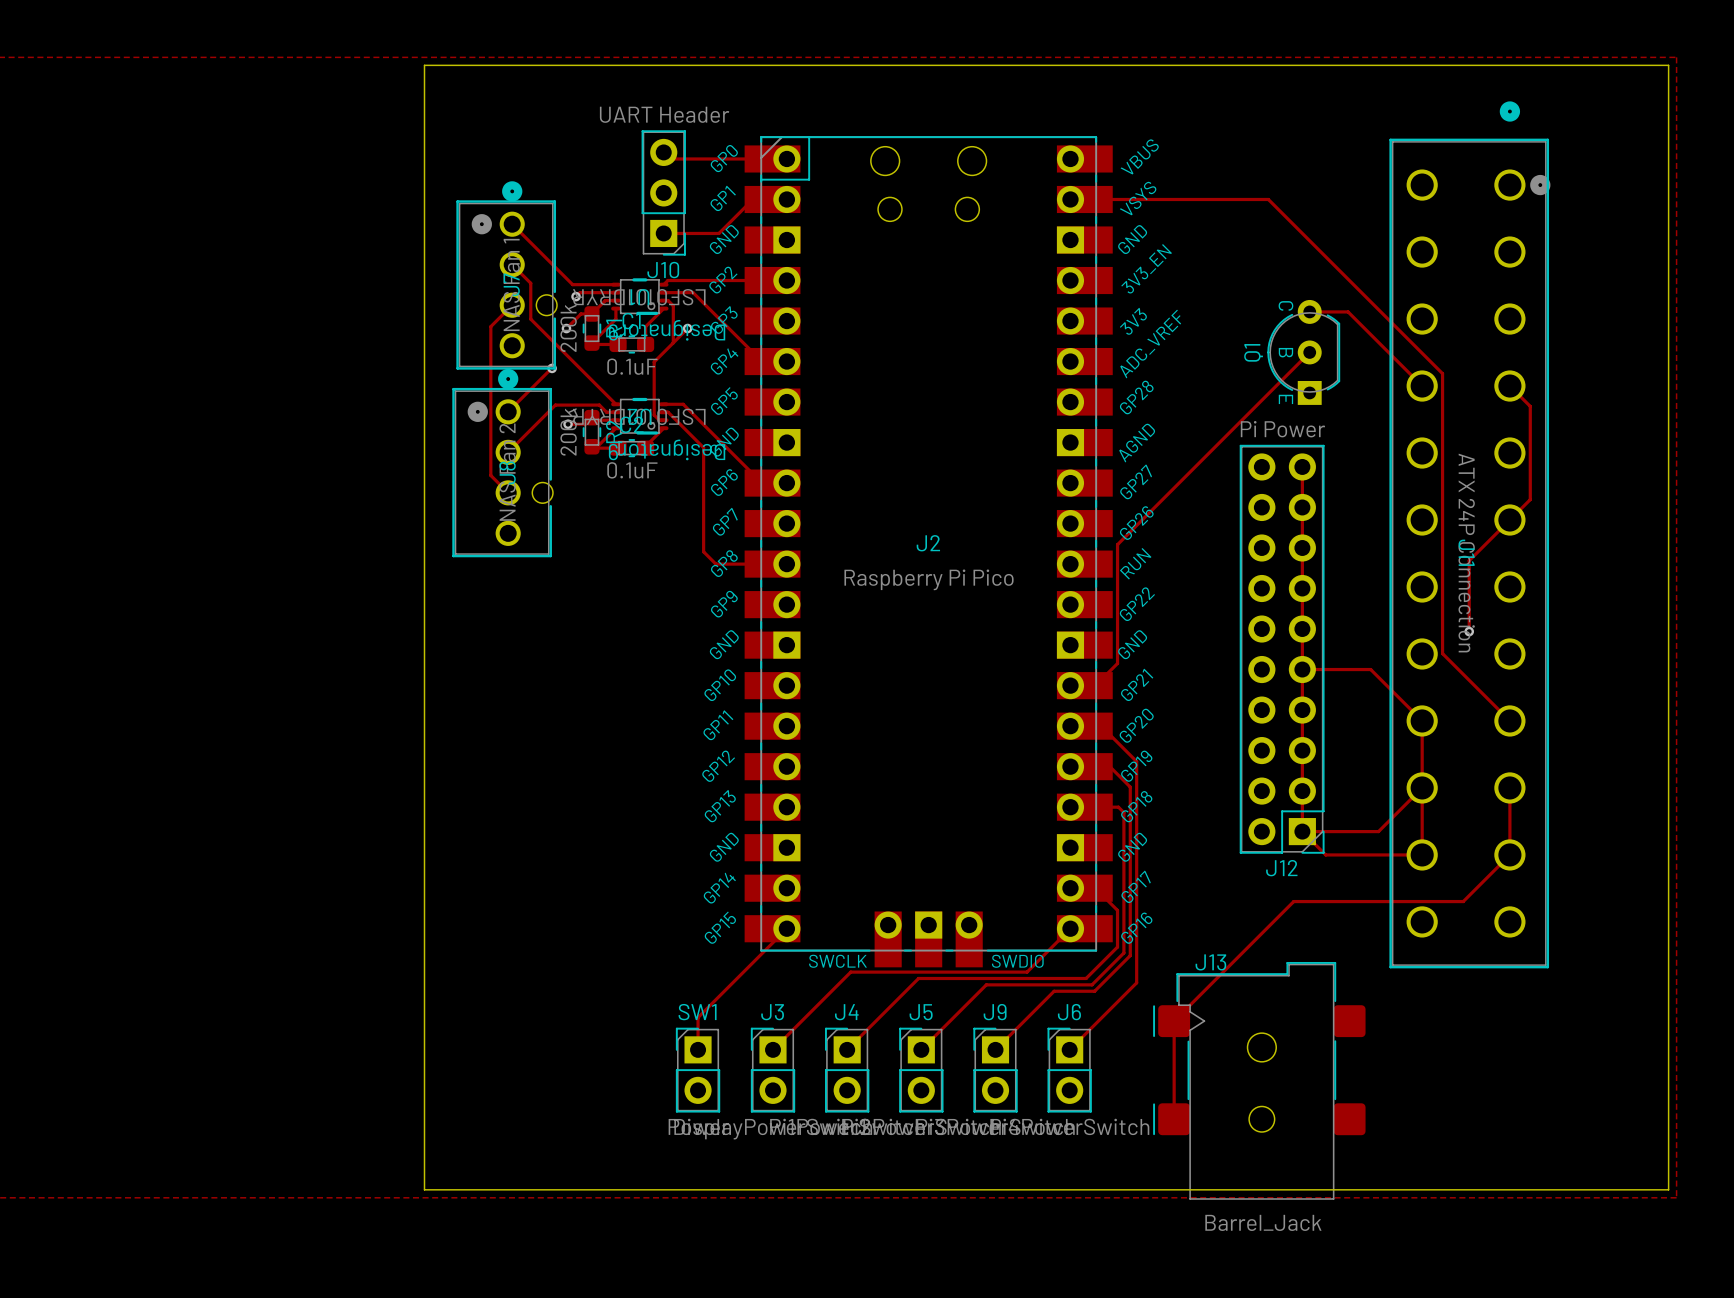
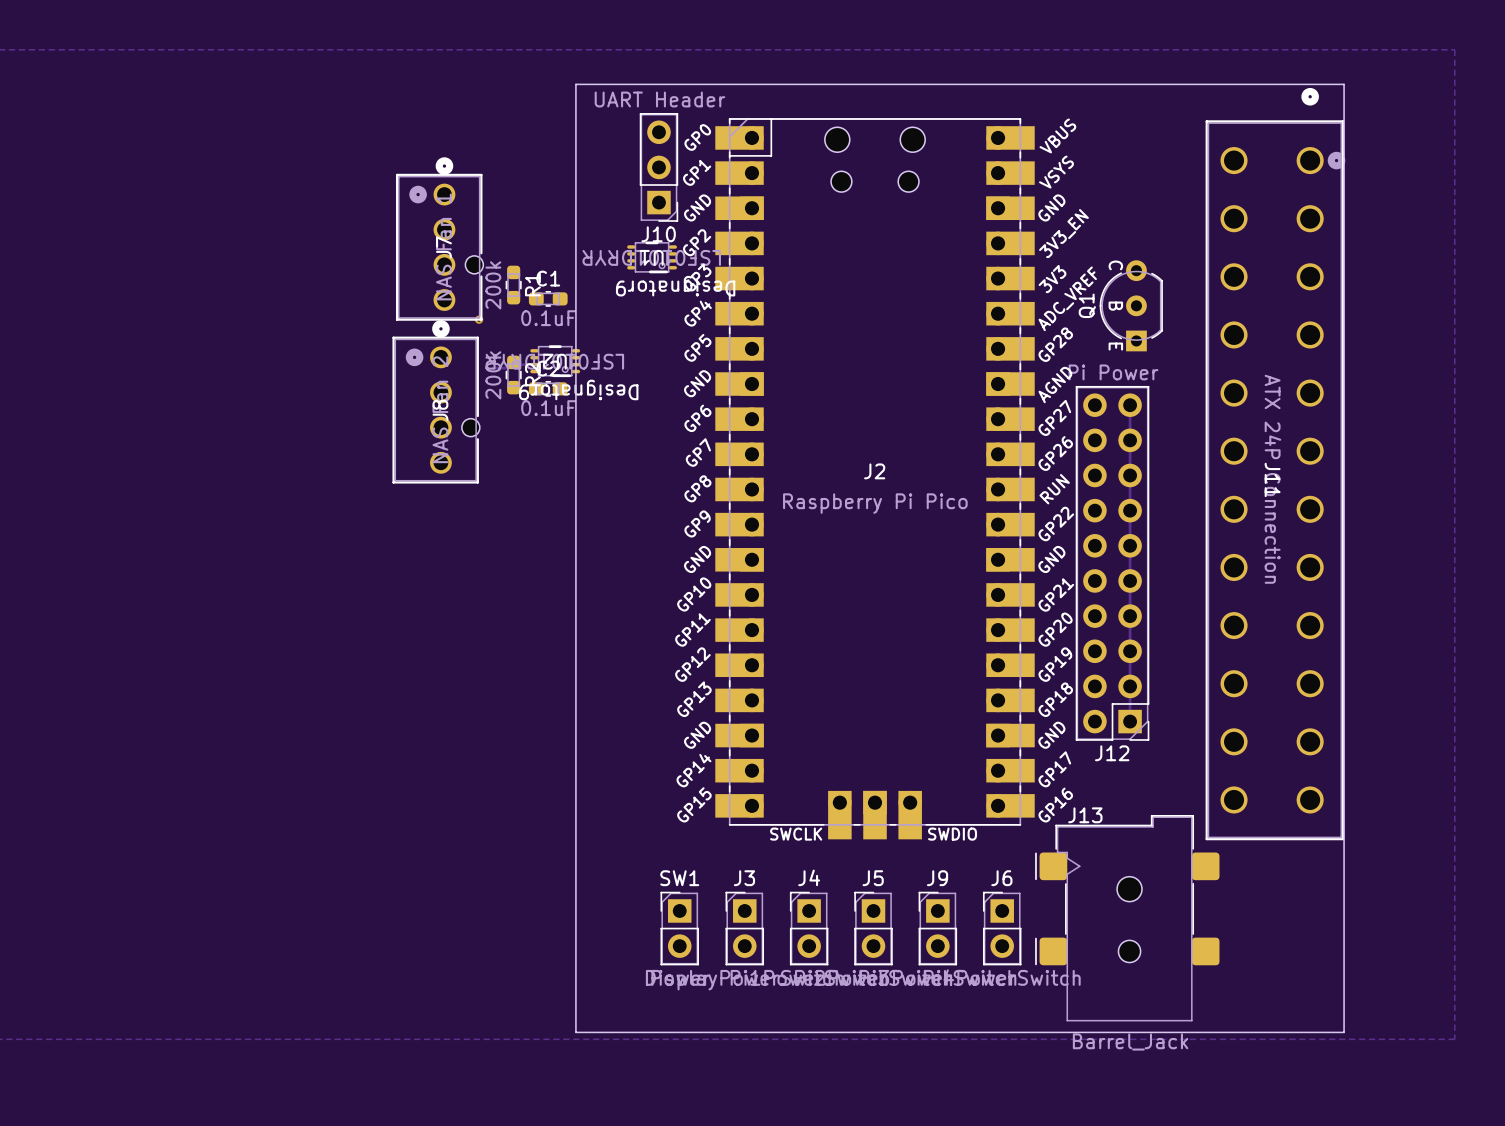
track: (663, 152) (670, 158) (786, 158) -> none
J10 position: (663, 192) -> (658, 167)
track: (786, 199) (752, 199) (718, 233) (663, 233) -> none
track: (1070, 199) (1268, 199) (1442, 373) (1442, 653) (1509, 720) -> none
track: (512, 224) (572, 284) (615, 284) -> none
track: (512, 264) (530, 283) (530, 319) (615, 404) -> none
track: (786, 280) (667, 280) (663, 284) -> none
track: (615, 292) (580, 292) (576, 296) -> none
track: (663, 292) (693, 292) (762, 361) (786, 361) -> none
via: (576, 296) -> none
U1 position: (639, 296) -> (652, 257)
track: (615, 300) (605, 300) (591, 313) (581, 313) (566, 328) -> none
track: (663, 300) (668, 300) (673, 305) (673, 342) -> none
track: (512, 305) (490, 326) (490, 475) (508, 492) -> none
track: (615, 308) (615, 319) (591, 343) (618, 344) -> none
track: (663, 308) (645, 326) (645, 344) -> none
track: (1309, 311) (1348, 311) (1422, 386) -> none
via: (566, 328) -> none
track: (687, 328) (654, 362) (654, 415) (659, 420) (663, 420) -> none
via: (687, 328) -> none
track: (1309, 352) (1117, 544) (1117, 663) (1095, 685) (1070, 685) -> none
track: (552, 368) (508, 411) -> none
track: (1509, 386) (1530, 406) (1530, 499) (1469, 560) (1469, 631) -> none
track: (663, 404) (683, 404) (762, 483) (786, 483) -> none
track: (615, 412) (606, 412) (599, 405) (555, 405) (508, 452) -> none
track: (663, 412) (668, 412) (703, 447) (703, 551) (715, 564) (786, 564) -> none
via: (568, 424) -> none
track: (615, 428) (597, 446) (591, 446) (618, 448) -> none
track: (663, 428) (645, 448) -> none
J2 position: (928, 551) -> (875, 478)
via: (1469, 631) -> none
track: (1302, 669) (1370, 669) (1422, 720) (1422, 854) (1325, 854) (1302, 831) (1378, 831) (1422, 787) -> none
track: (1070, 726) (1101, 726) (1136, 761) (1136, 982) (1069, 1049) -> none
track: (1070, 766) (1109, 766) (1130, 787) (1130, 955) (1094, 991) (1054, 991) (995, 1049) -> none
track: (1509, 787) (1509, 854) (1463, 901) (1293, 901) (1174, 1021) (1174, 1119) -> none
track: (1070, 807) (1118, 807) (1123, 812) (1123, 952) (1092, 984) (986, 984) (921, 1049) -> none
track: (1070, 888) (1095, 888) (1117, 910) (1117, 947) (1086, 978) (918, 978) (847, 1049) -> none
track: (786, 928) (698, 1017) (698, 1049) -> none
track: (1070, 928) (1027, 972) (850, 972) (773, 1049) -> none
SW1 position: (698, 1070) -> (679, 928)
J3 position: (773, 1070) -> (744, 928)
J4 position: (847, 1070) -> (809, 928)
J5 position: (921, 1070) -> (873, 928)
J9 position: (995, 1070) -> (937, 928)
J6 position: (1069, 1070) -> (1002, 928)
J13 position: (1259, 1080) -> (1127, 918)
board edge: (663, 1189) (424, 1189) (424, 65) (1668, 65) (1668, 1189) (1548, 1189) -> (575, 1032) (575, 84) (1344, 84) (1344, 1032)

